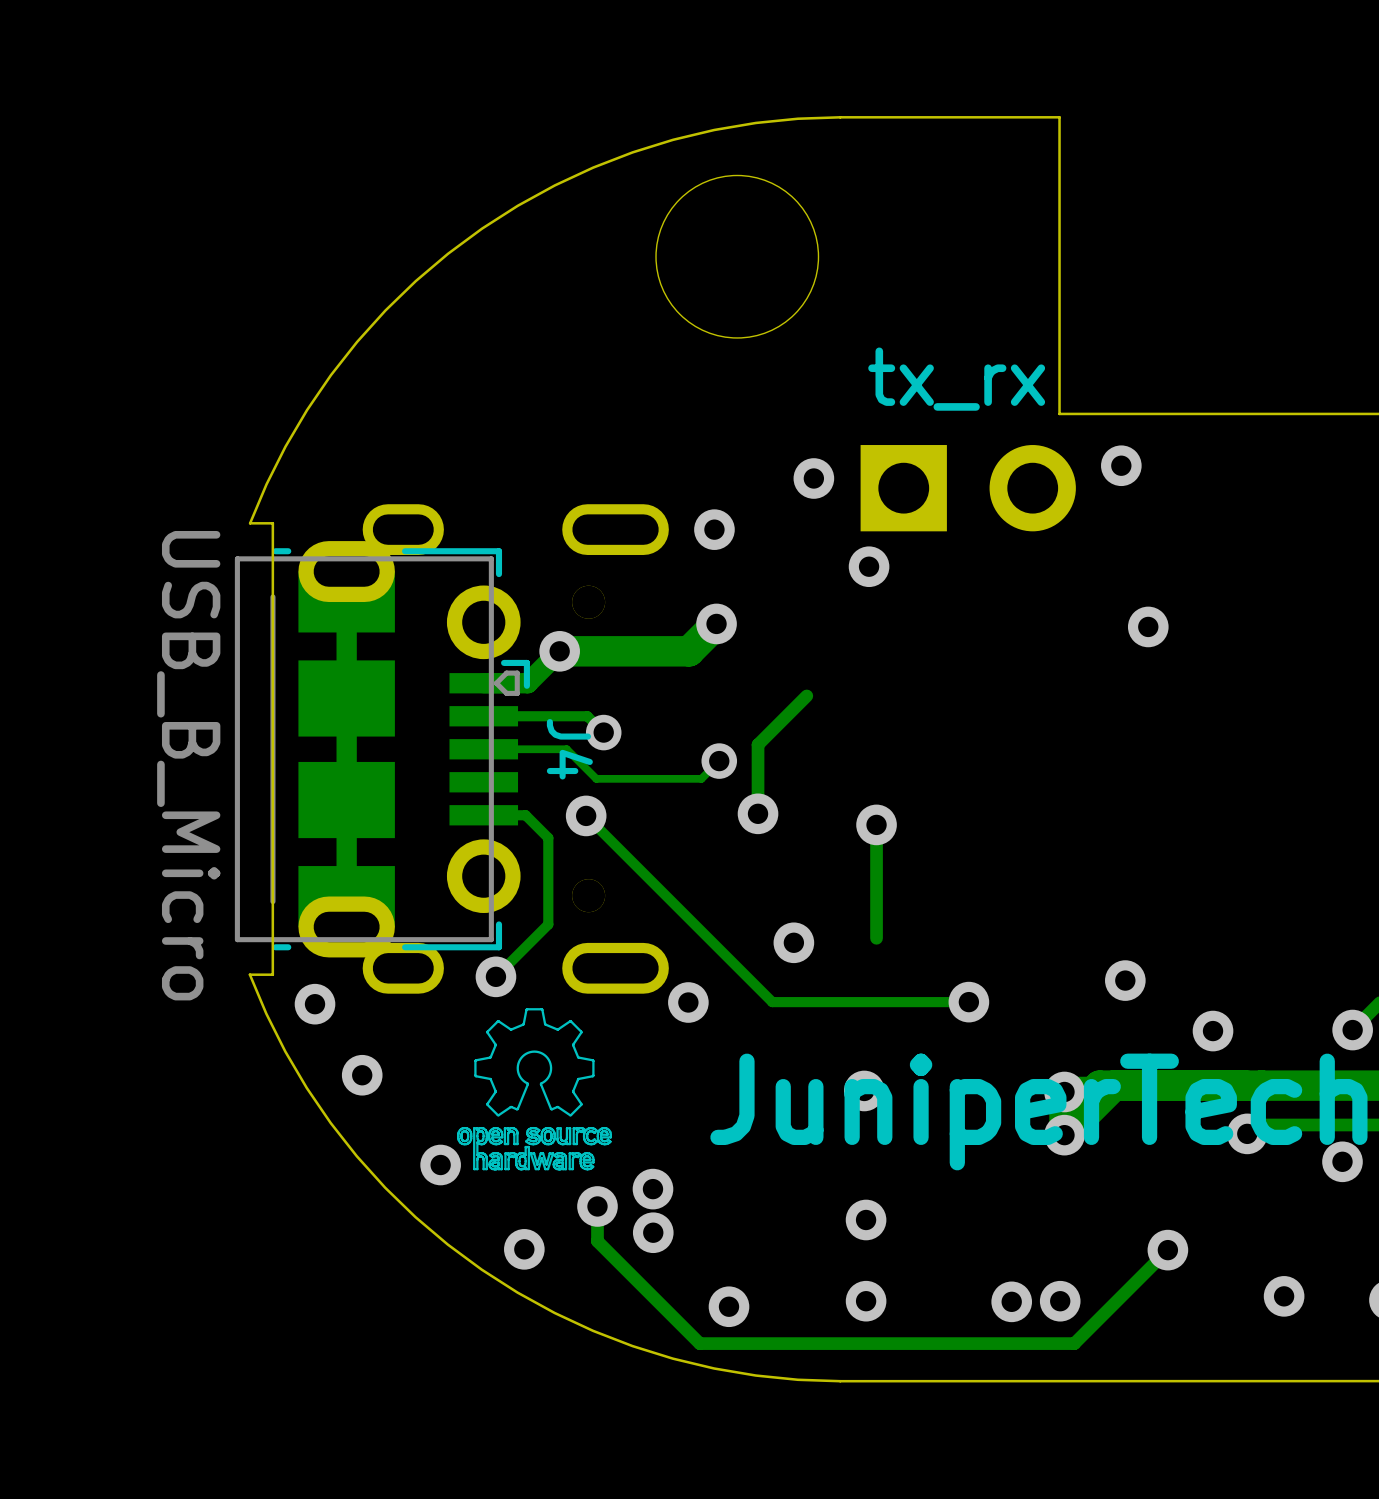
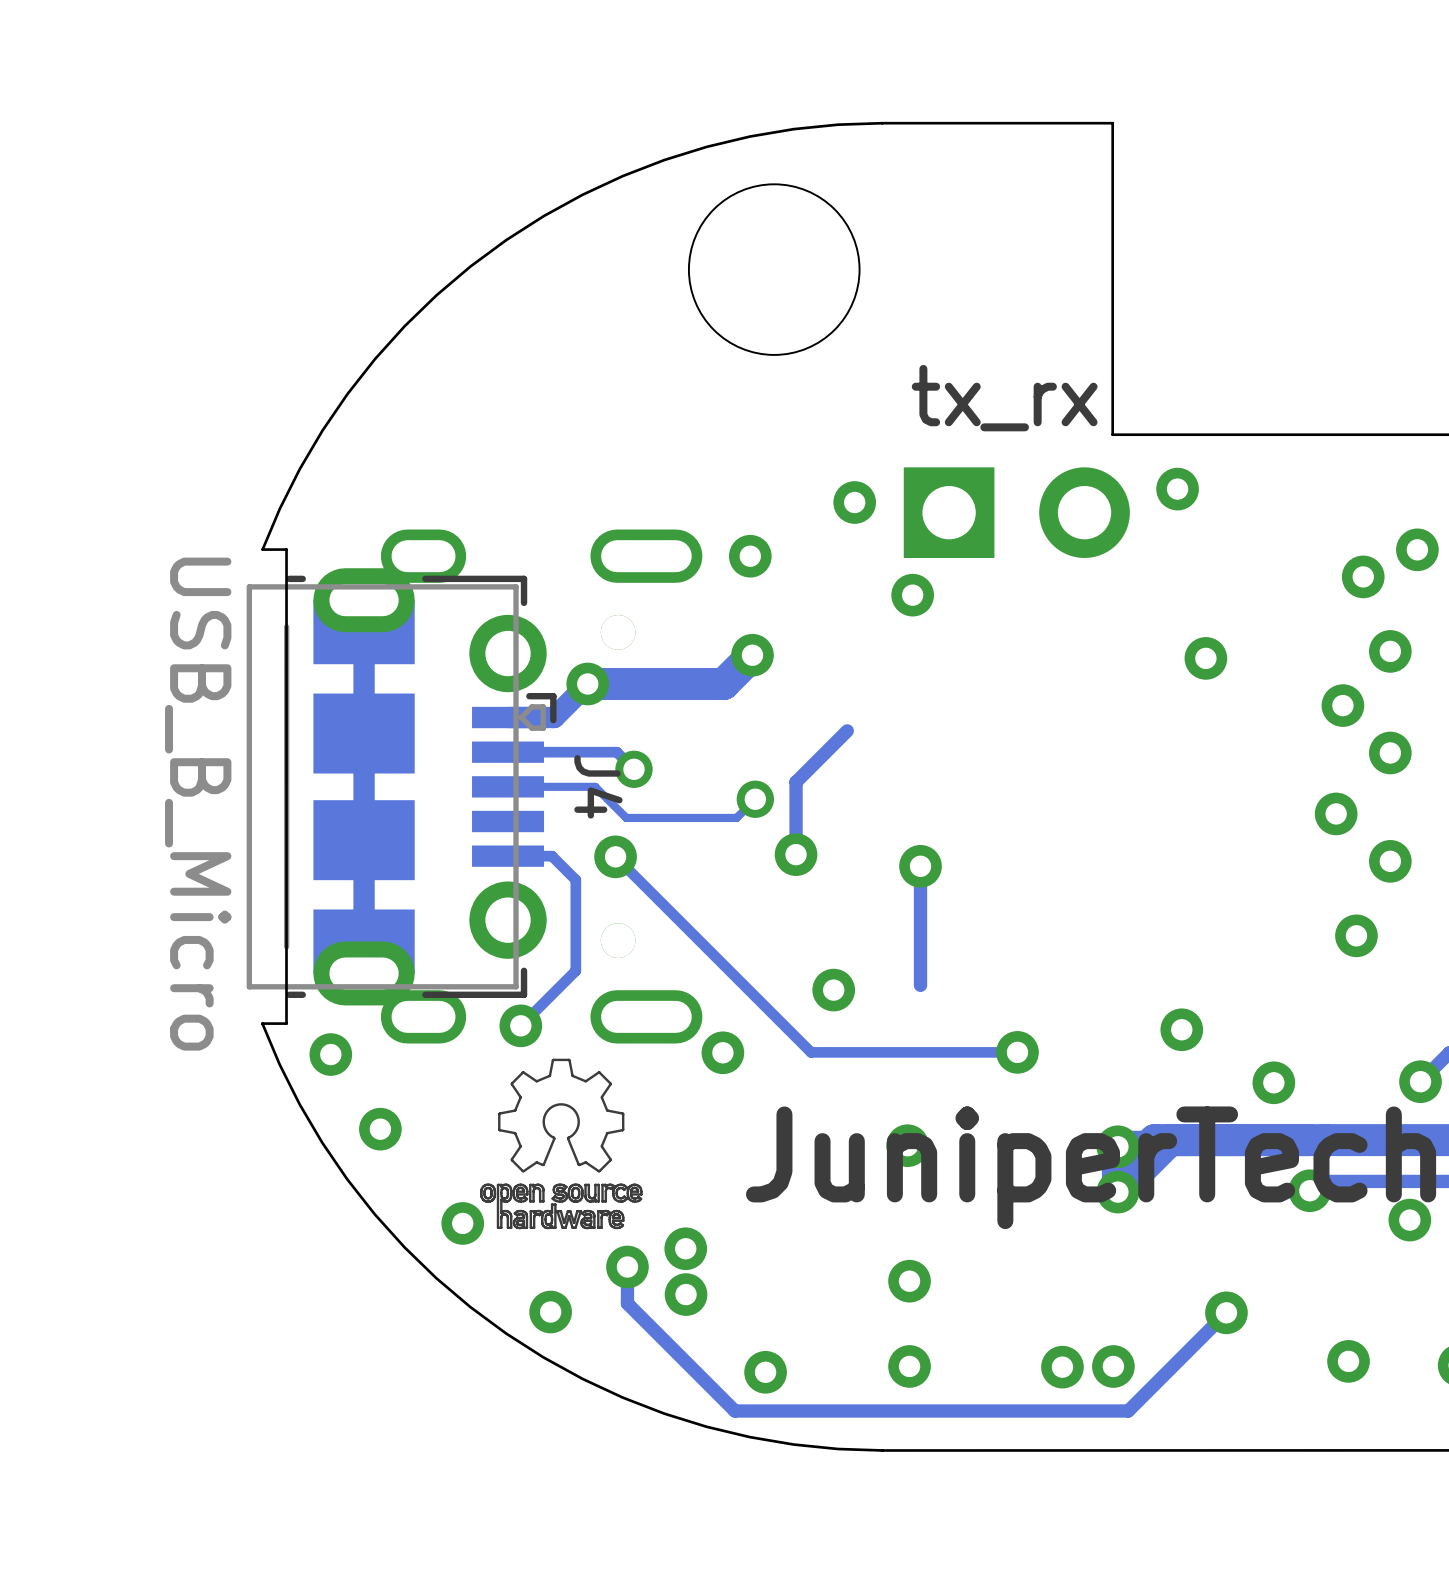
via: none -> (1417, 549)
via: none -> (1363, 576)
via: none -> (1390, 651)
via: none -> (1342, 705)
via: none -> (1390, 752)
via: none -> (1336, 813)
via: none -> (1390, 861)
via: none -> (1356, 935)

